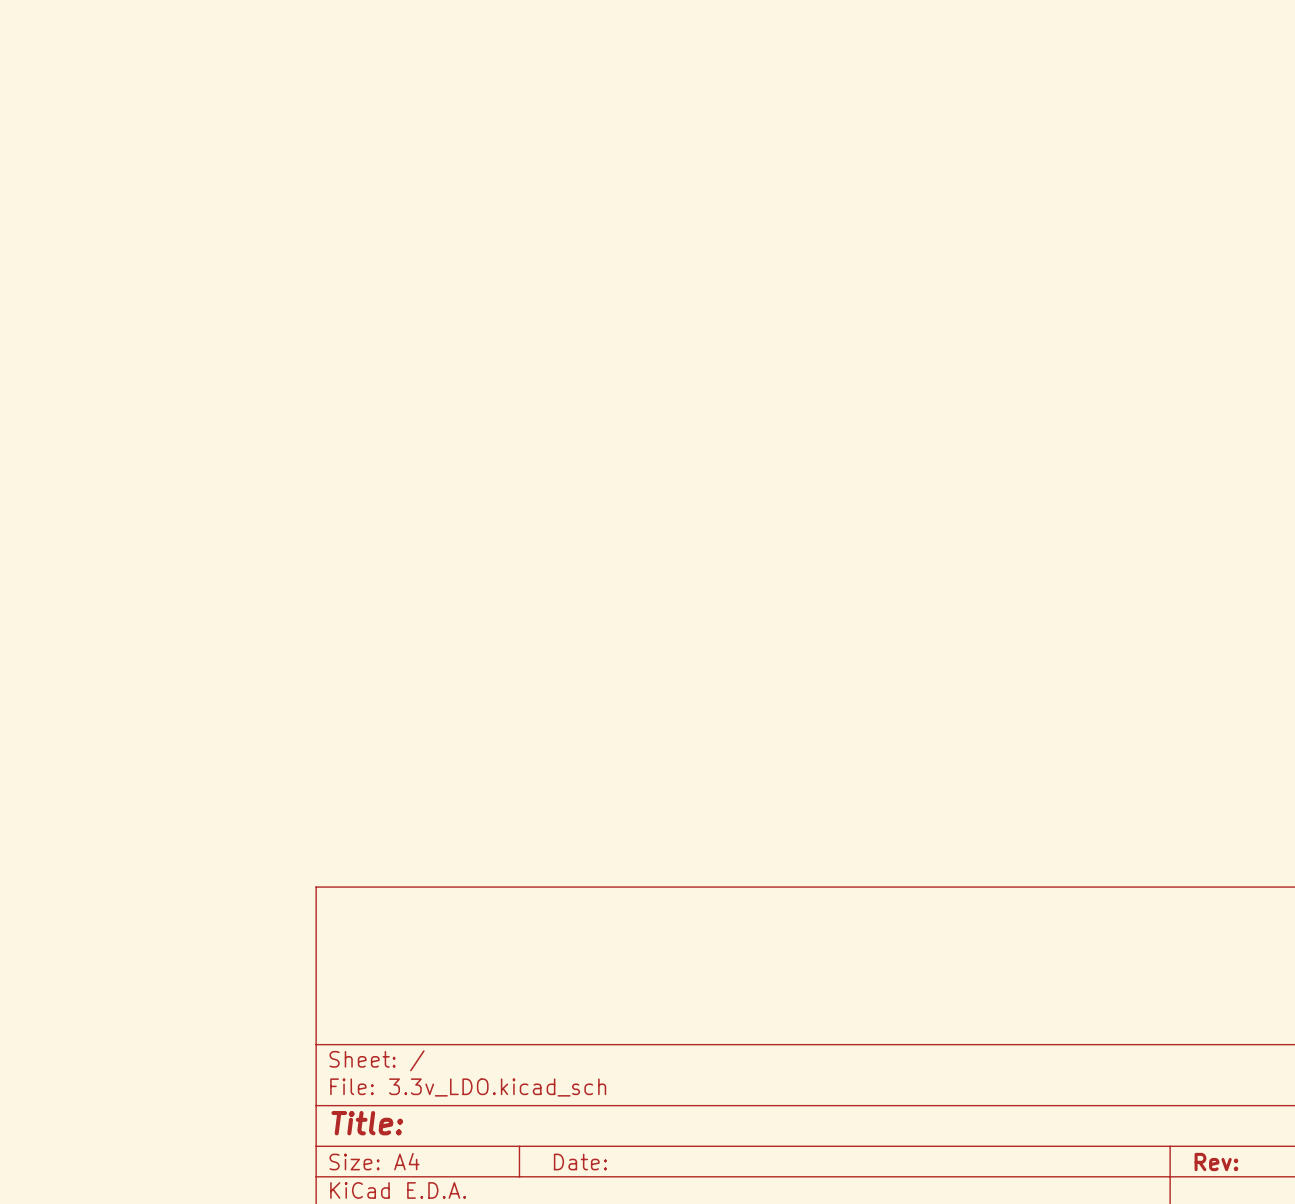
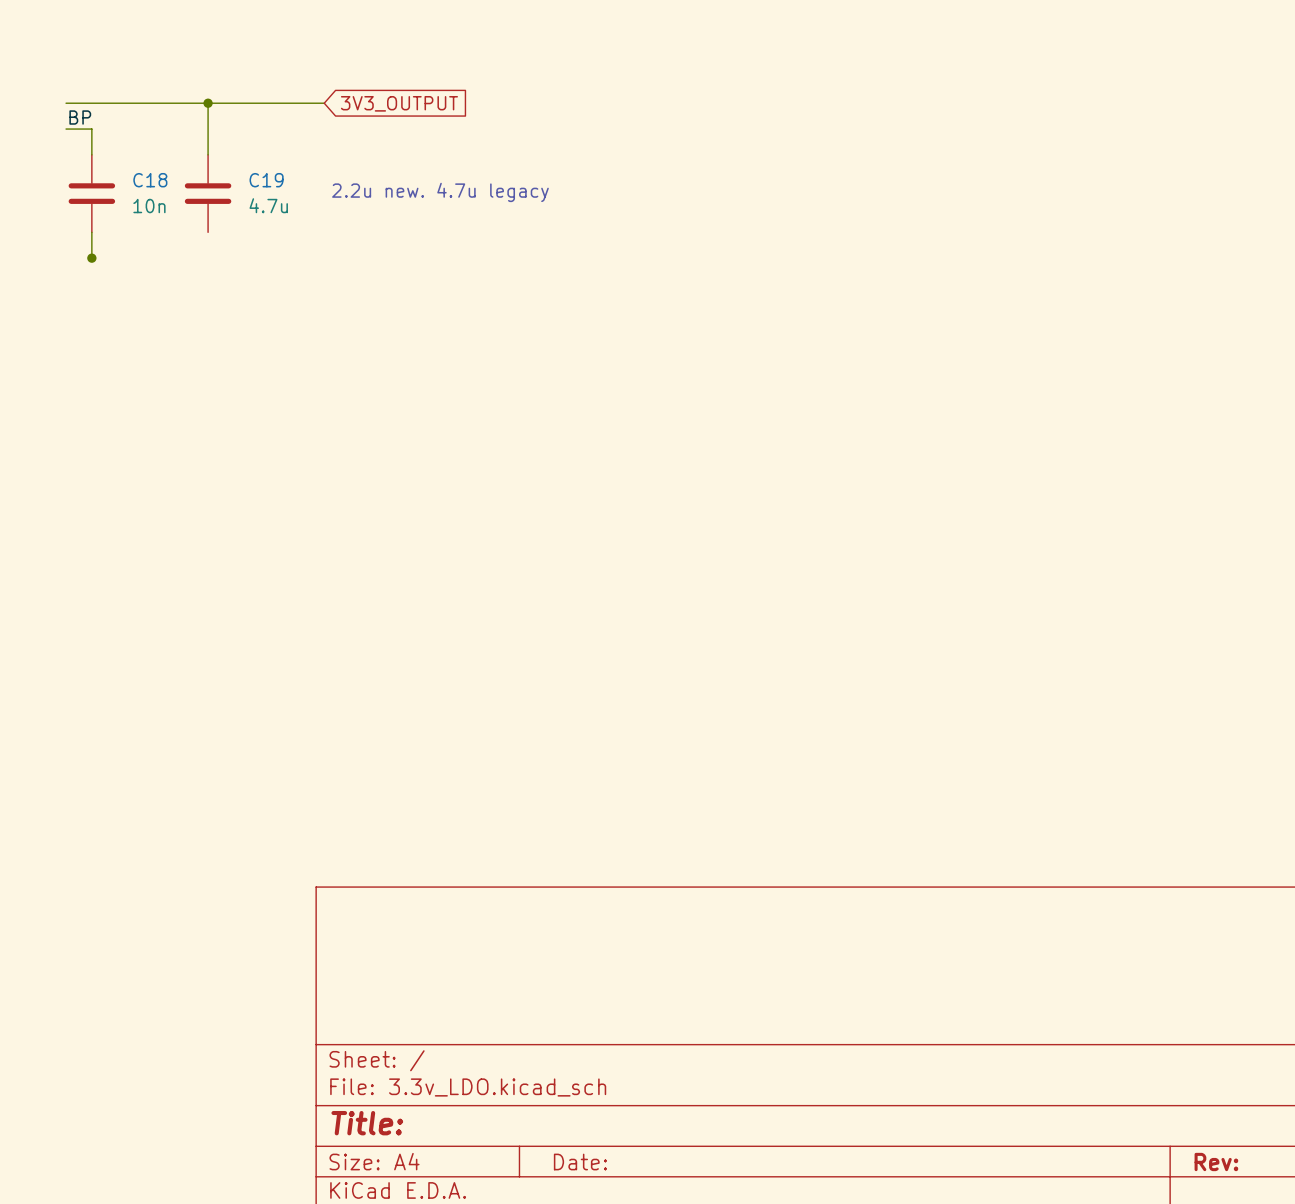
wire: none -> (66, 103) (324, 103)
wire: none -> (208, 103) (208, 154)
junction: none -> (208, 103)
global label: none -> 3V3_OUTPUT (399, 103)
label: none -> BP (80, 117)
wire: none -> (66, 129) (91, 129) (91, 154)
text: none -> 2.2u new. 4.7u legacy (440, 192)
C18: none -> 10n (91, 193)
C19: none -> 4.7u (208, 193)
wire: none -> (91, 232) (91, 258)
junction: none -> (91, 258)

